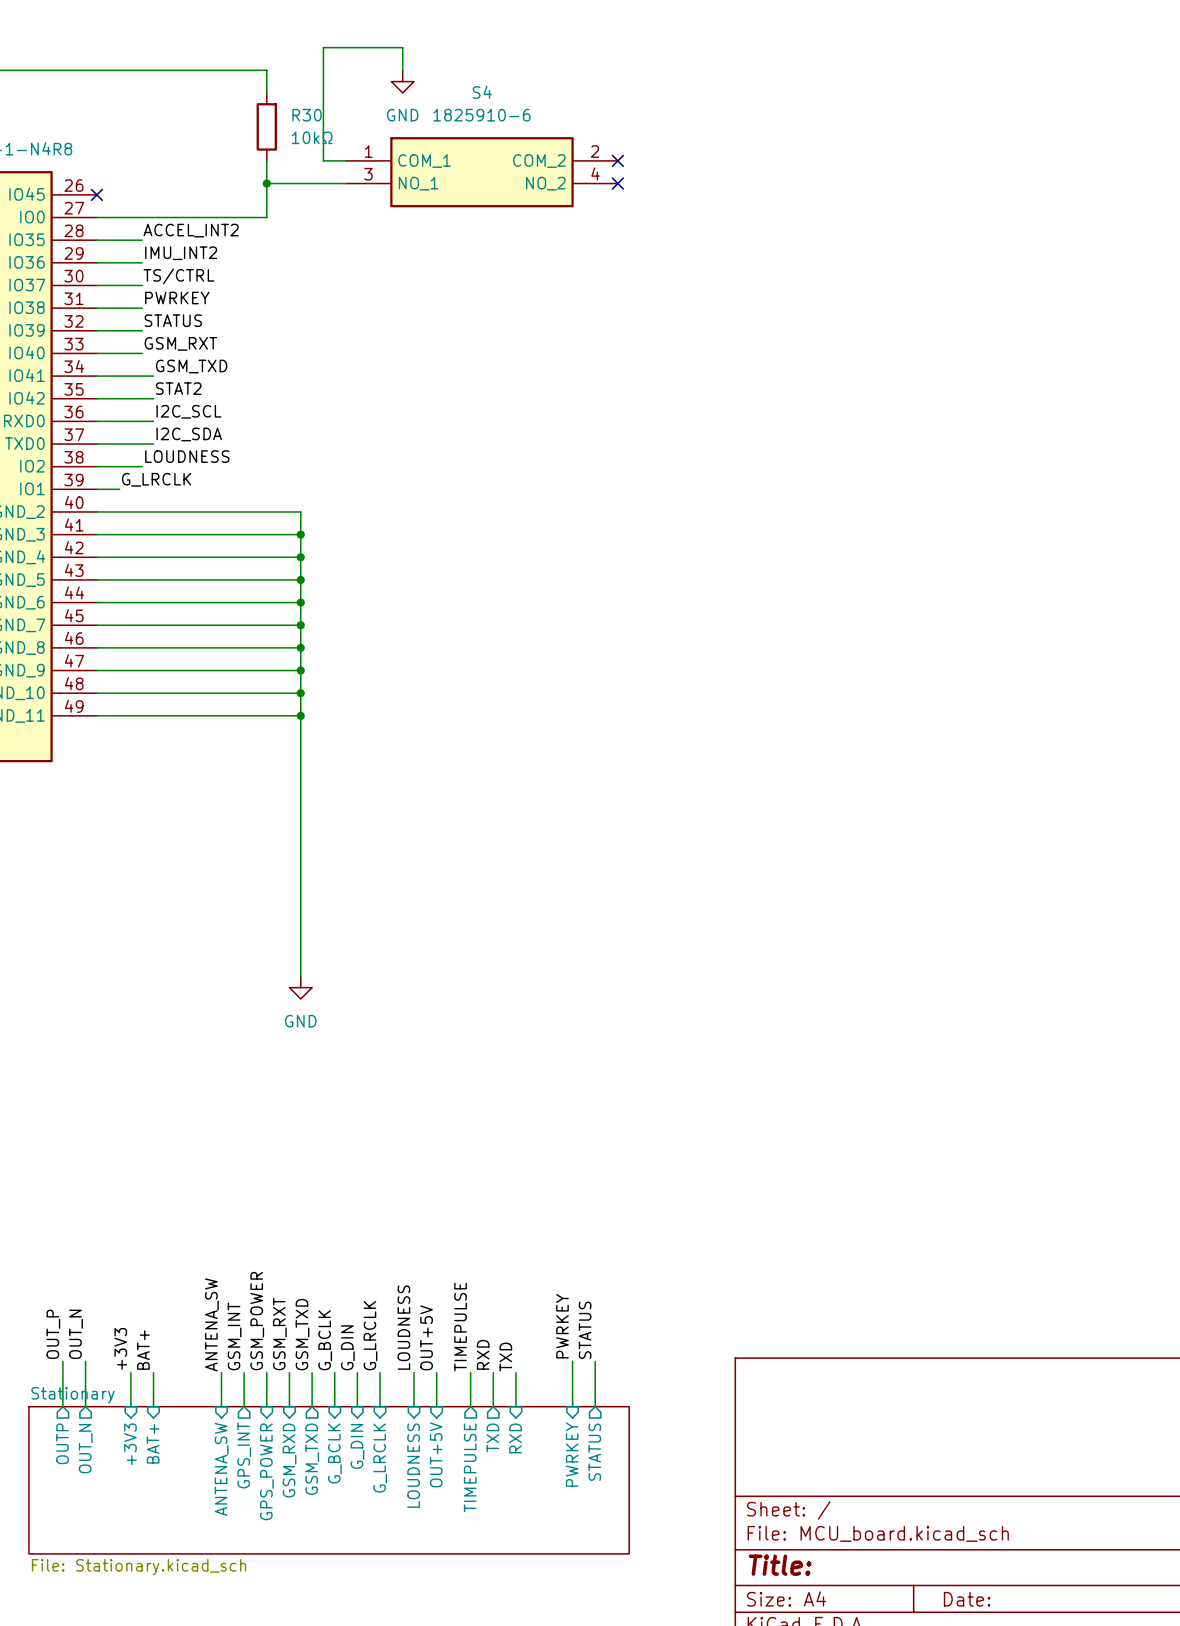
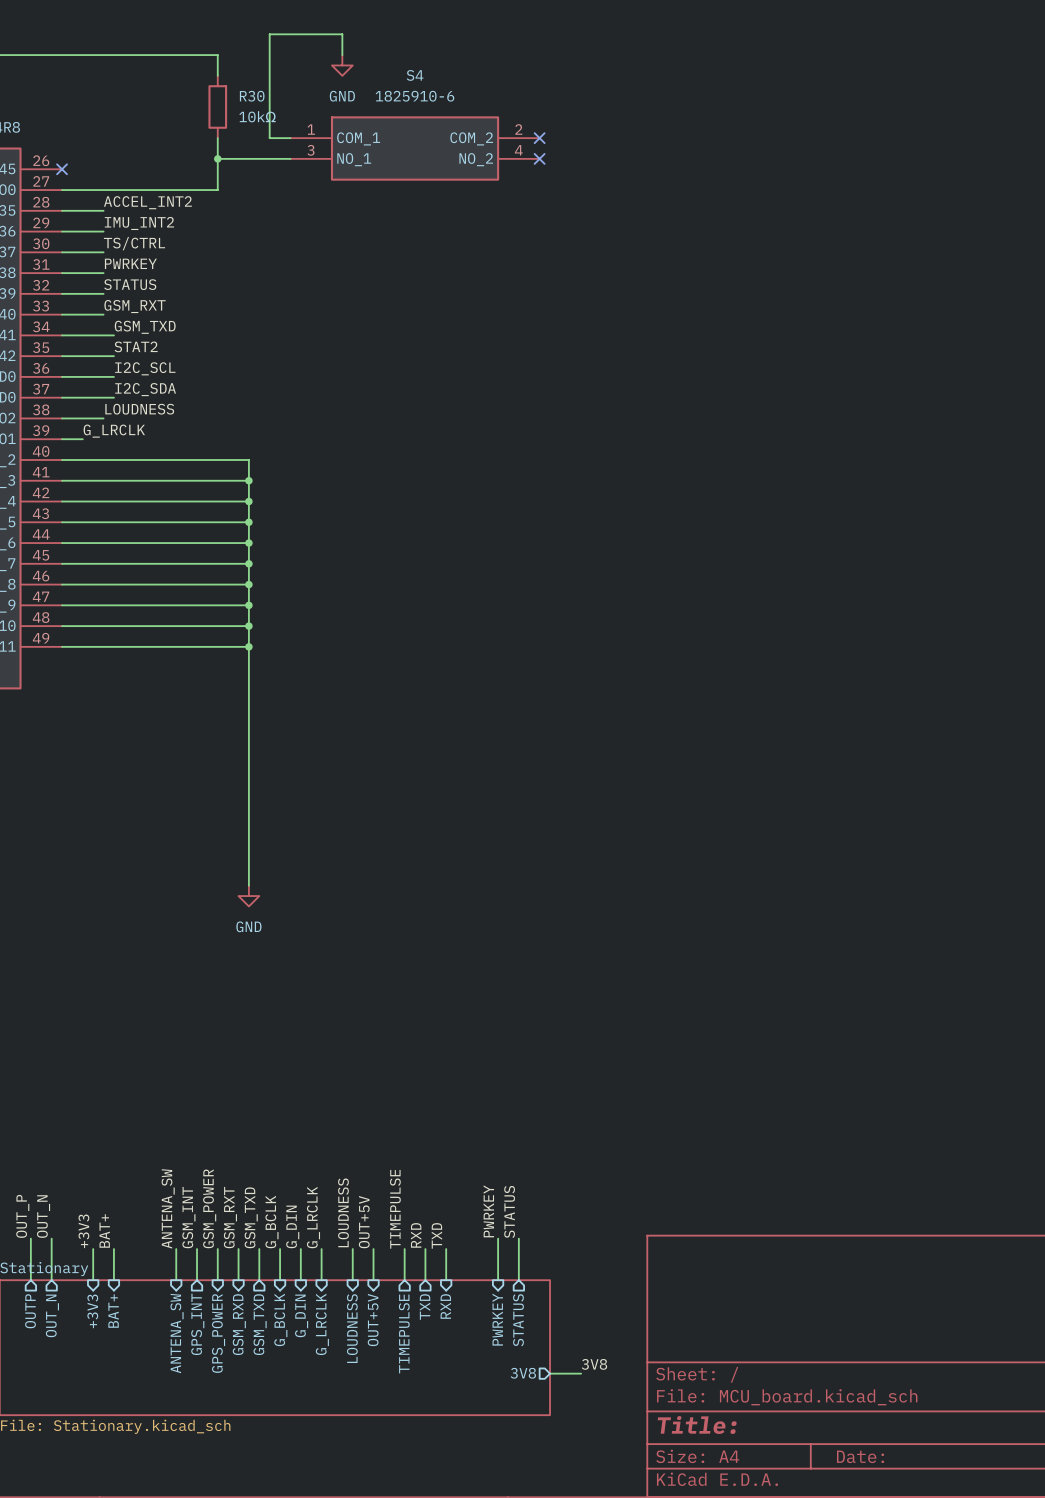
label: none -> 3V8 (594, 1364)
sheet pin: none -> 3V8 (523, 1373)
wire: none -> (550, 1373) (581, 1373)

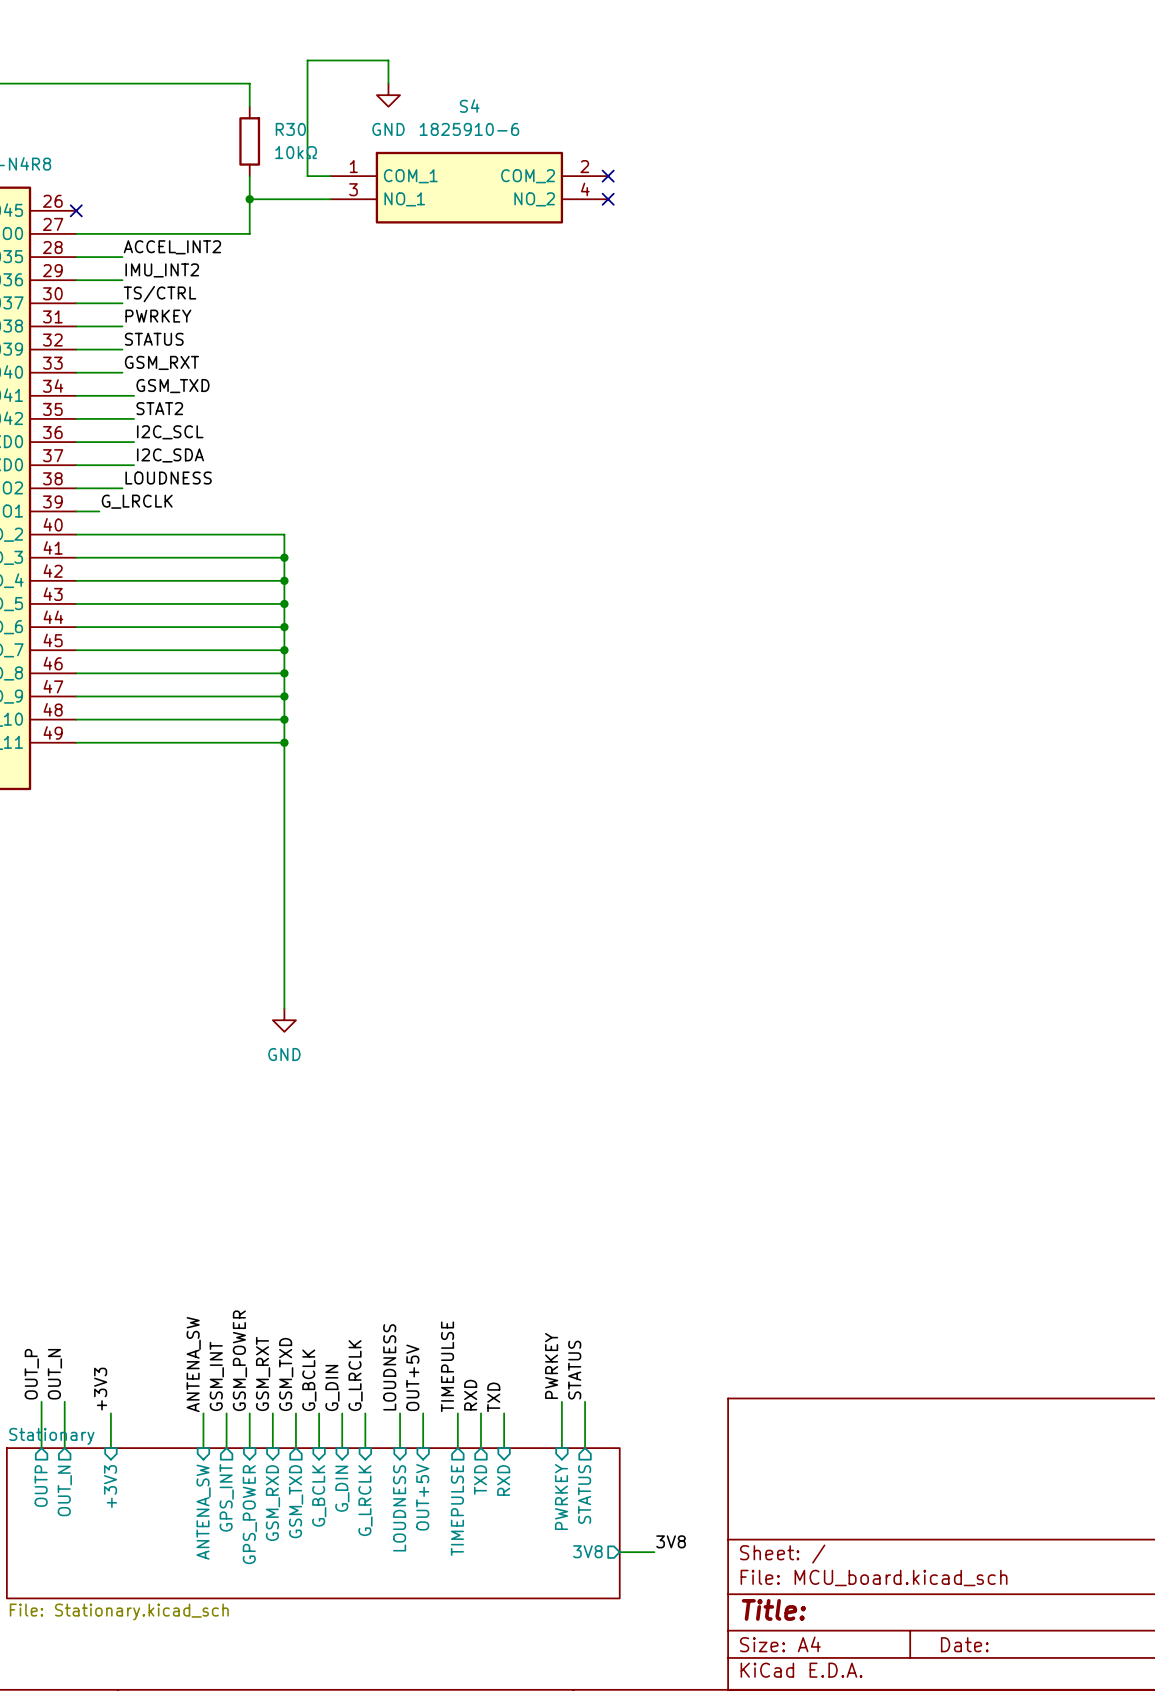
label: BAT+ (104, 1231) -> none
wire: (113, 1249) (113, 1280) -> none
sheet pin: BAT+ (113, 1311) -> none

